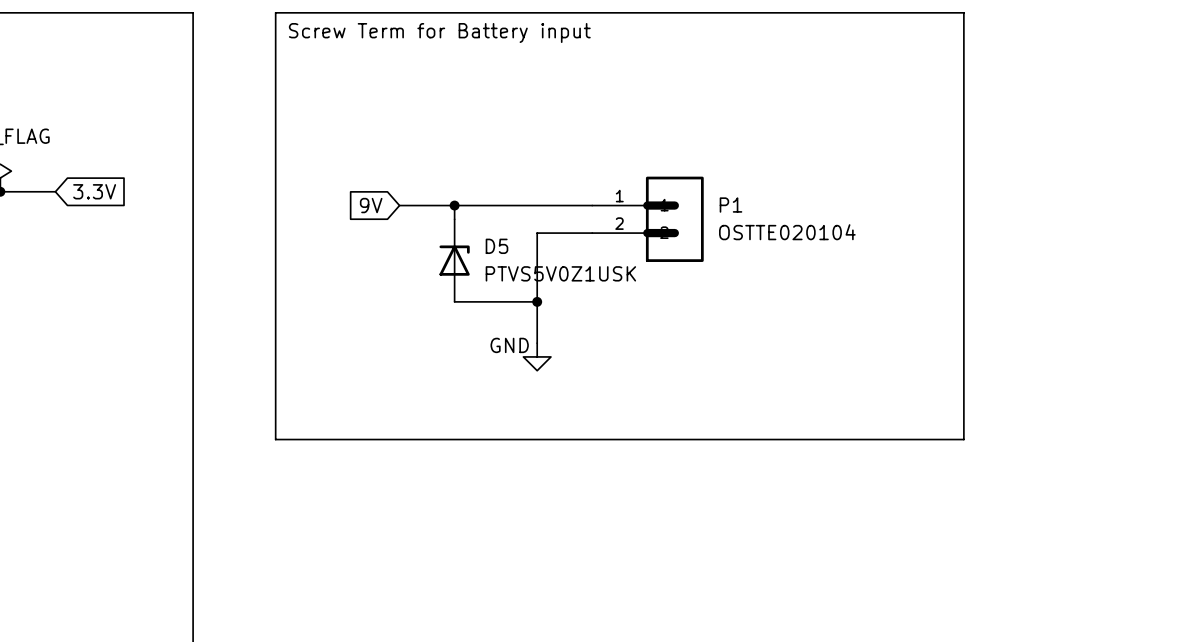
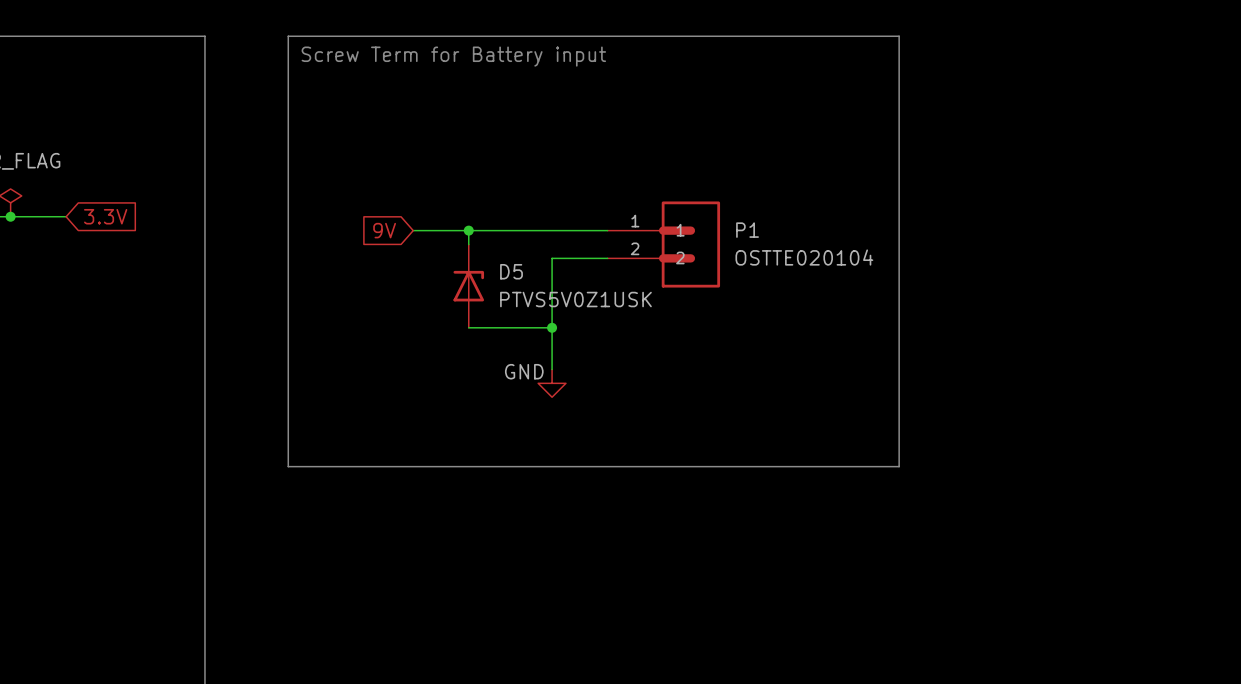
line: (881, 12) (963, 12) (963, 439) (881, 439) -> (899, 36) (899, 466)

